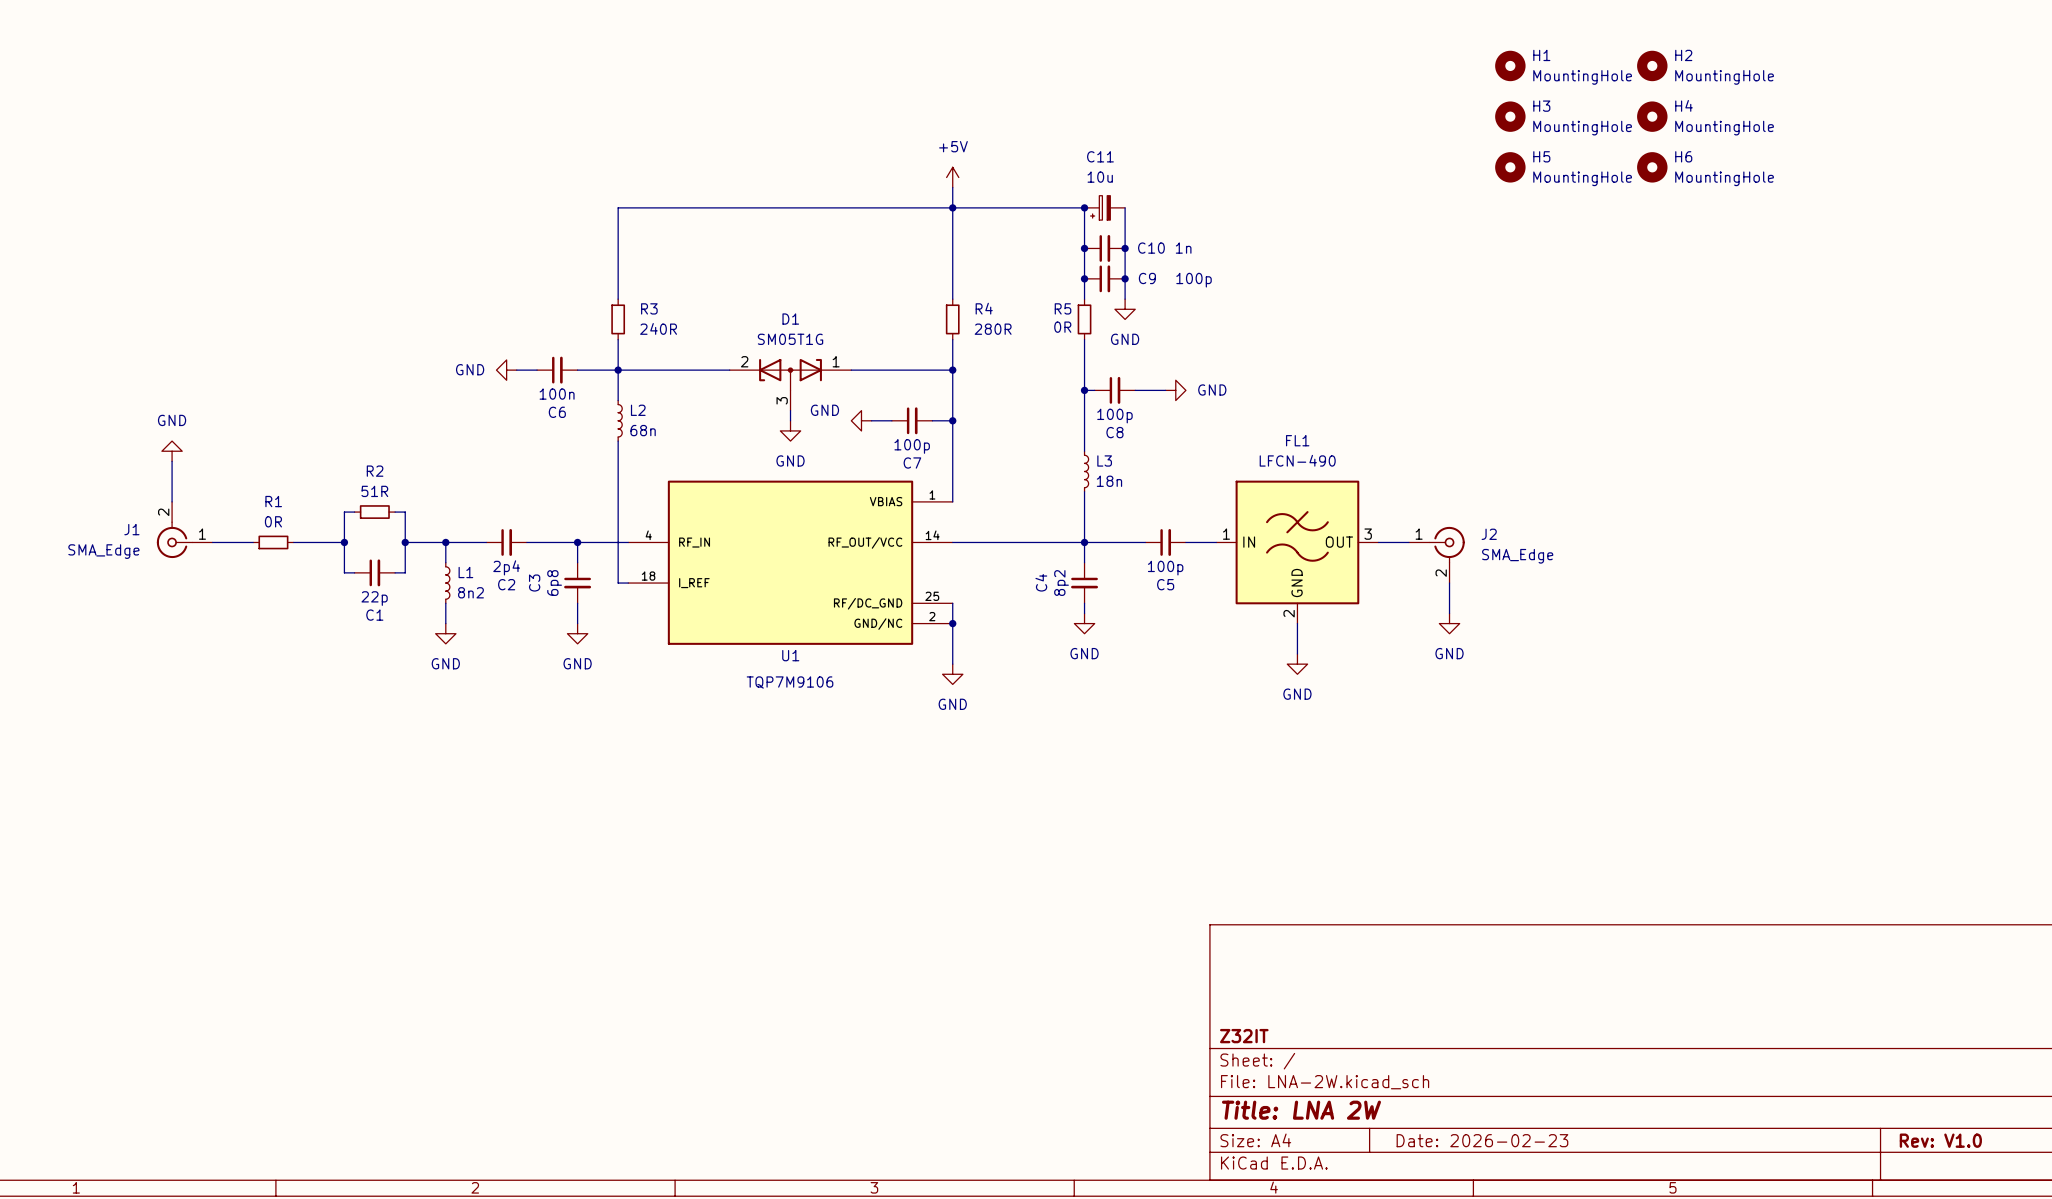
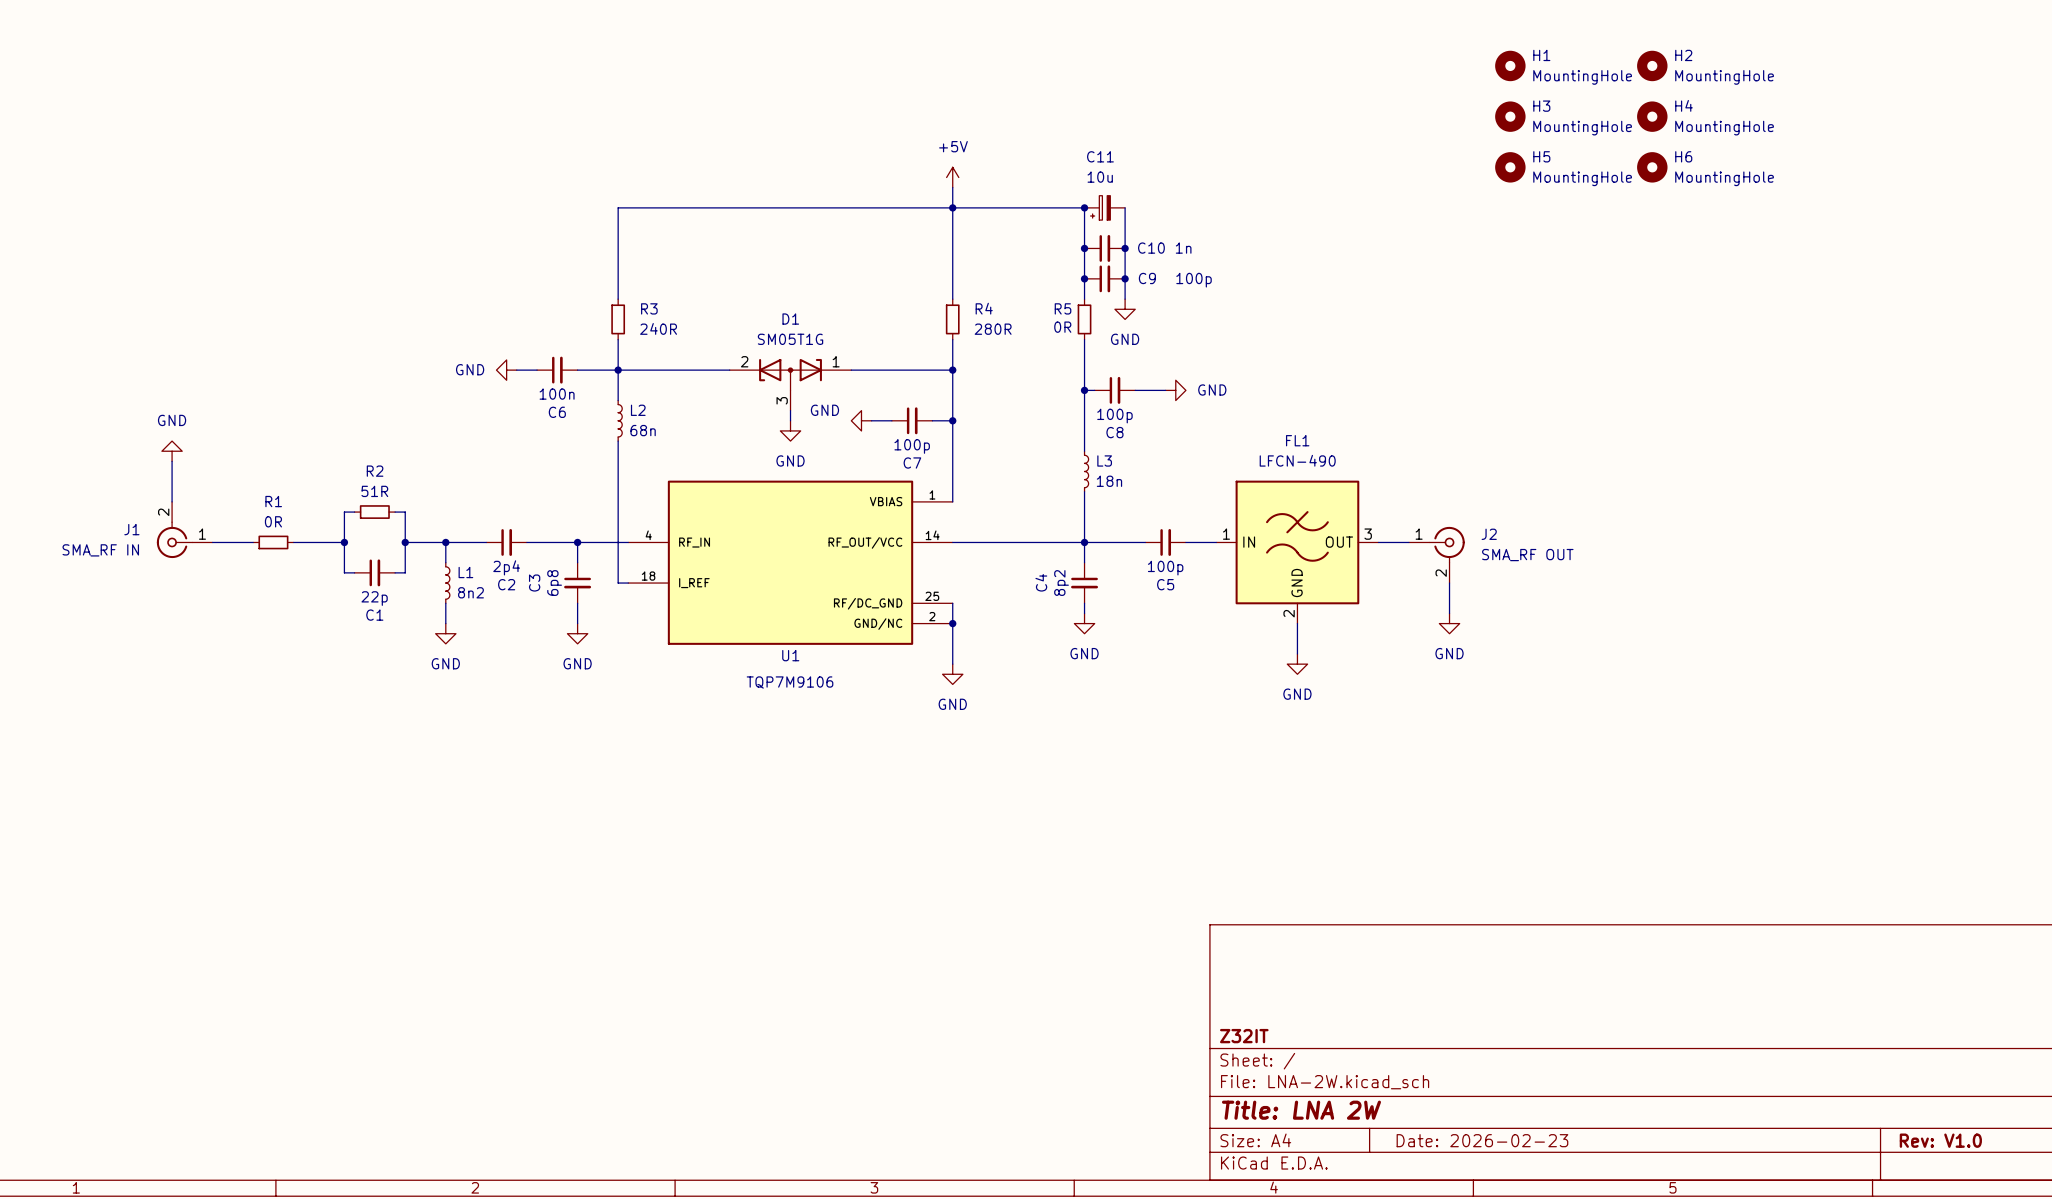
J1 value: SMA_Edge (103, 551) -> SMA_RF IN (100, 550)
J2 value: SMA_Edge (1517, 556) -> SMA_RF OUT (1527, 555)

